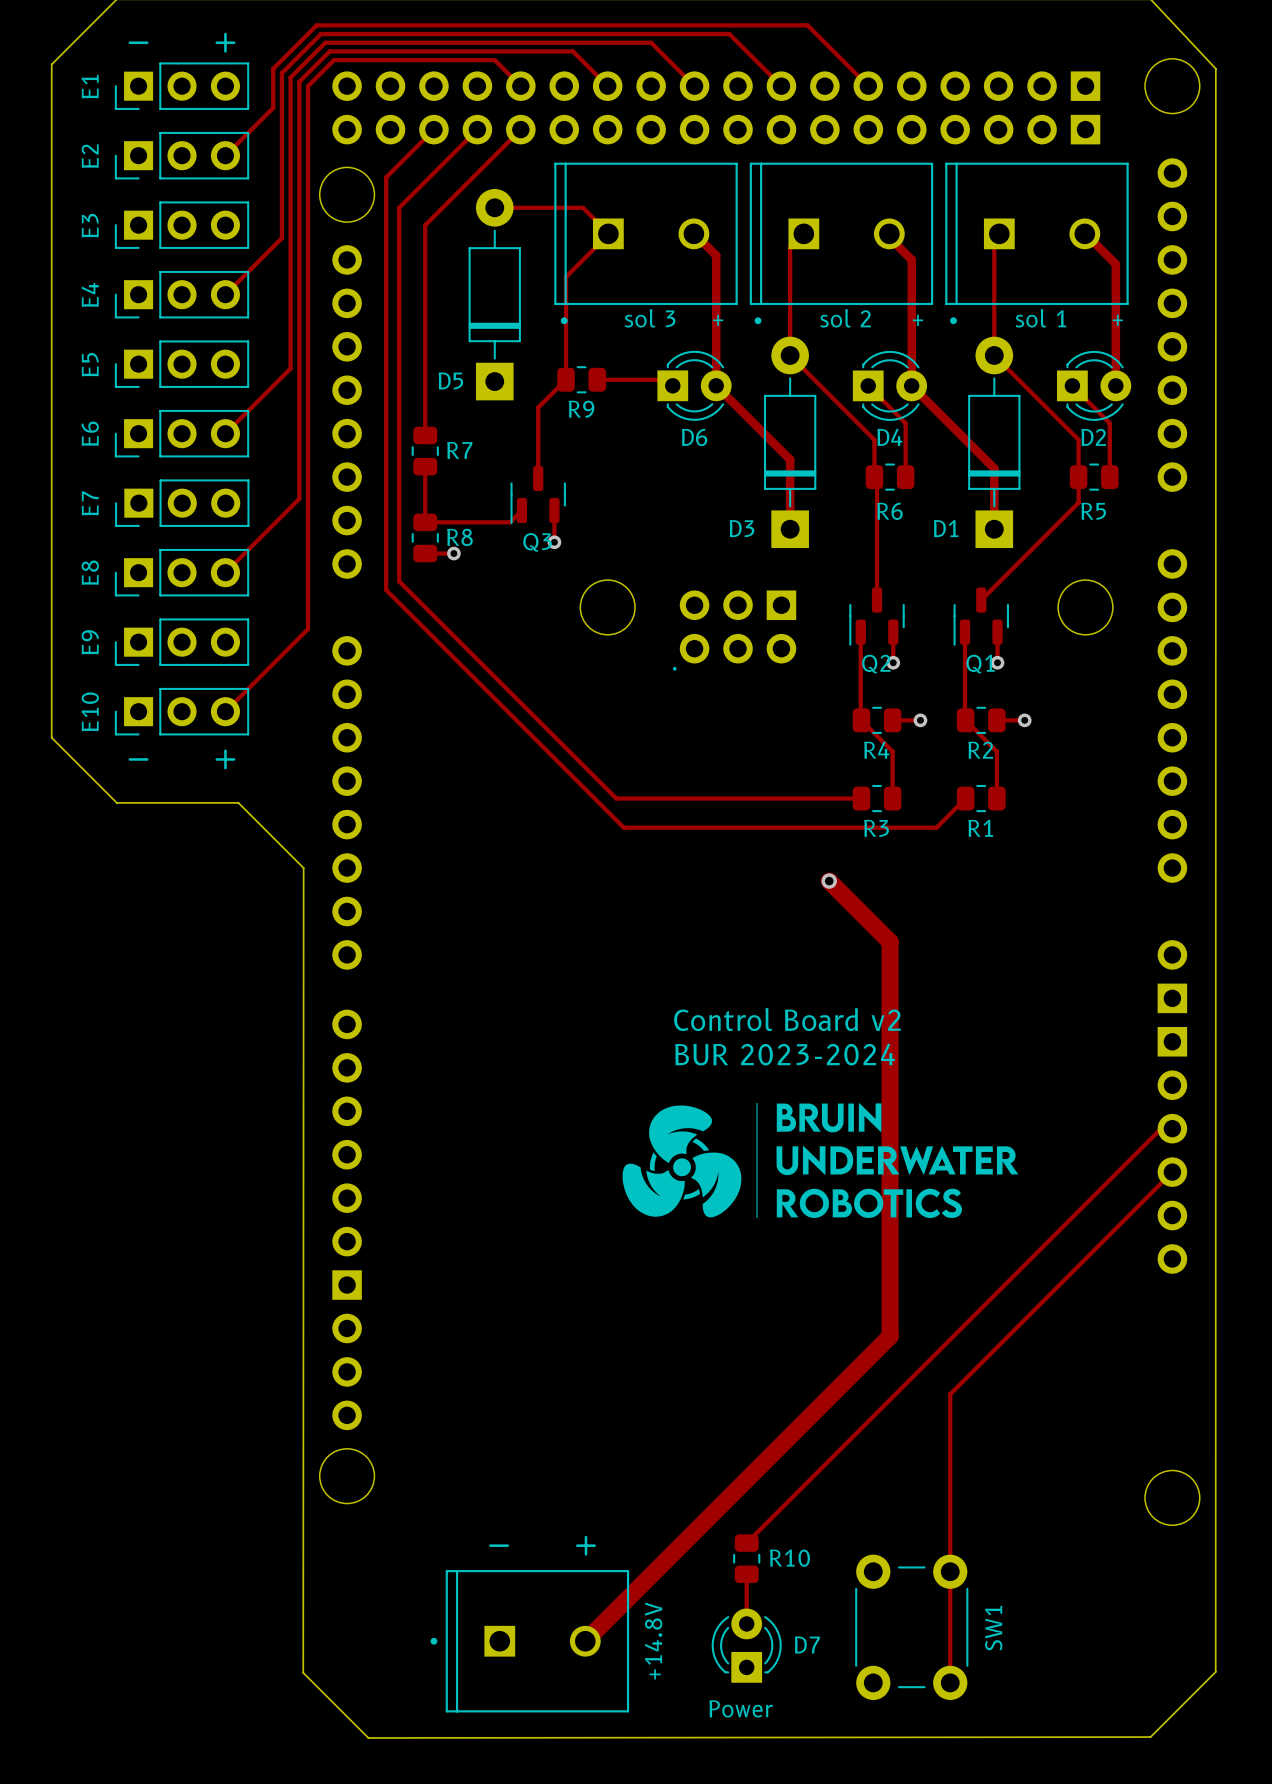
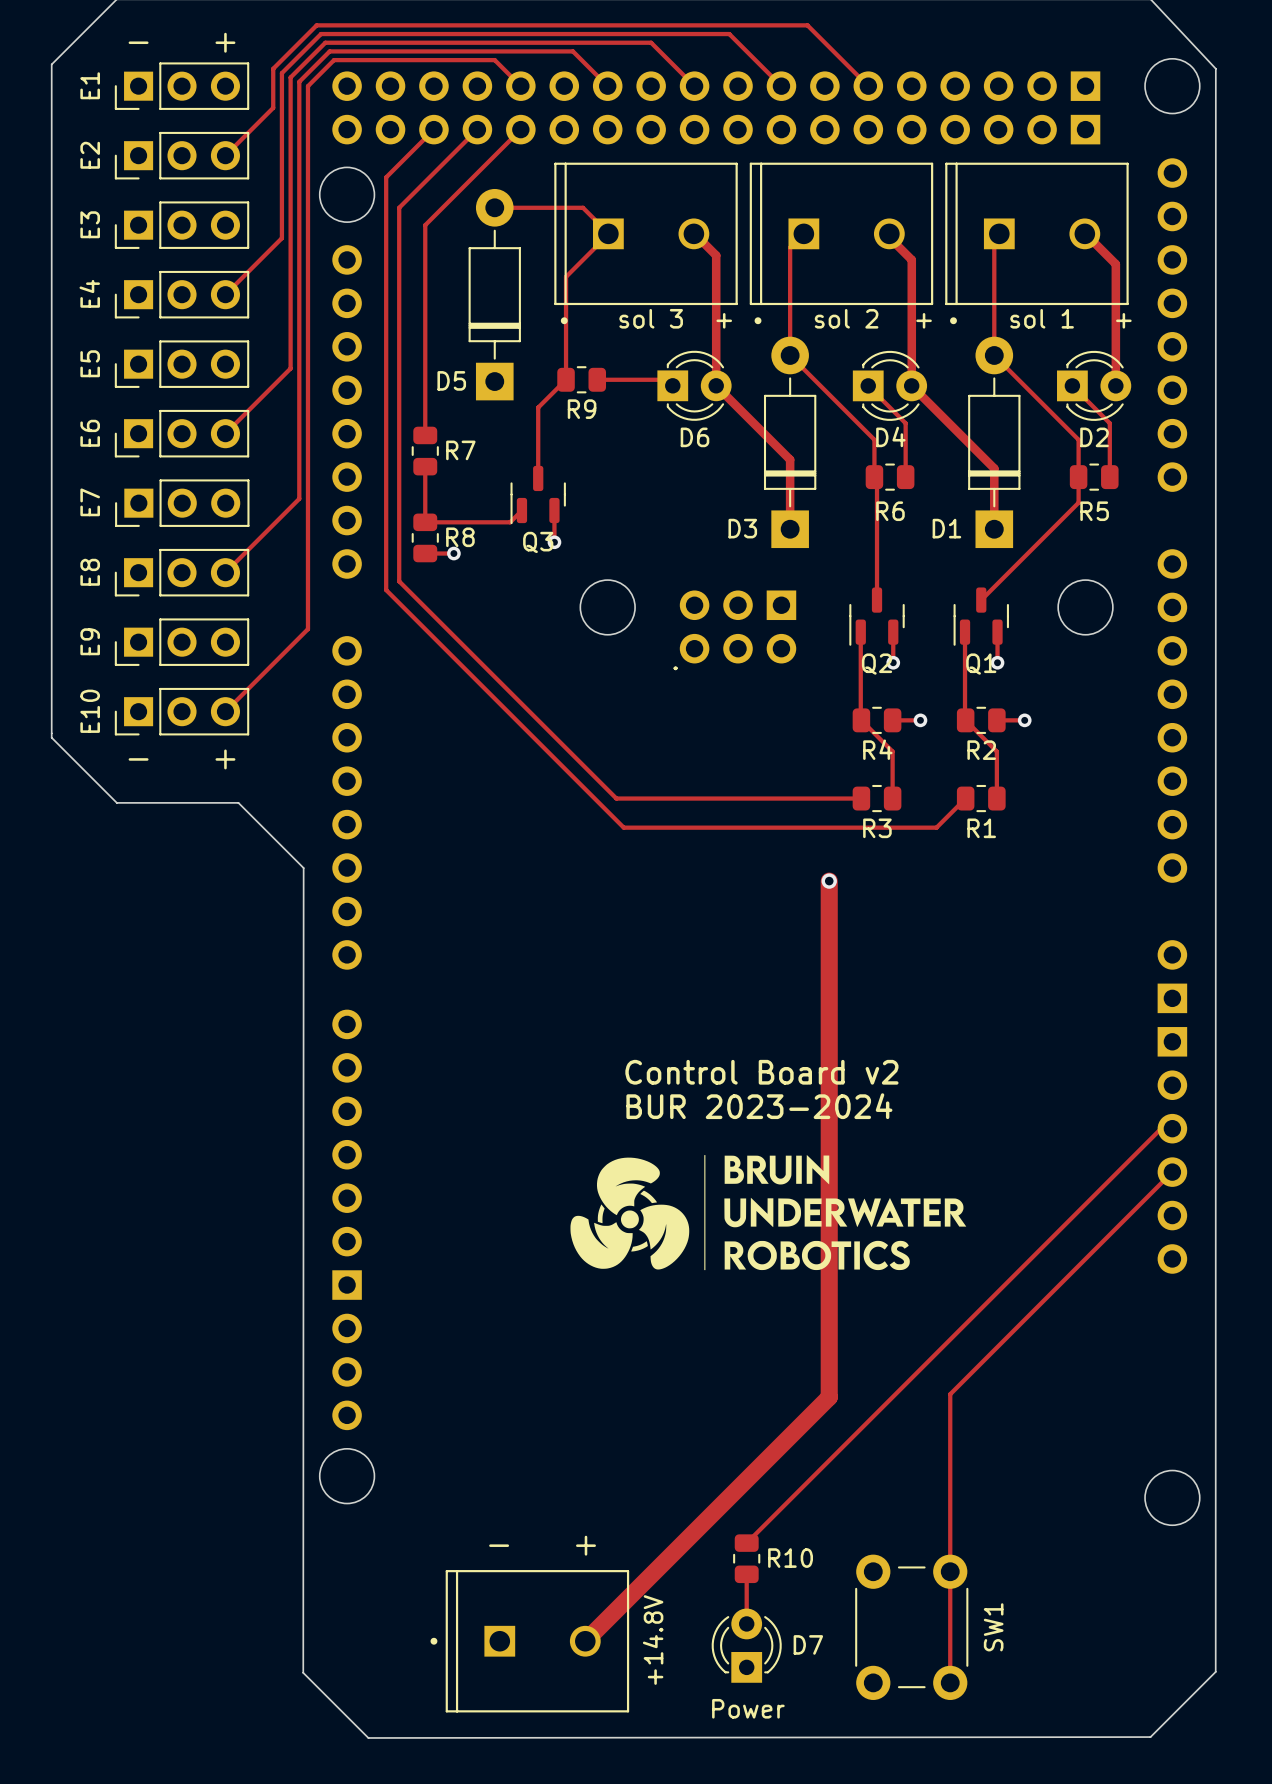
track: (829, 881) (890, 941) (890, 1336) (829, 1397) -> (829, 881) (829, 1397)
text position: Control Board v2 (787, 1019) -> Control Board v2 (761, 1072)
text position: BUR 2023-2024 (785, 1054) -> BUR 2023-2024 (759, 1106)
drawing position: (820, 1160) -> (768, 1212)

